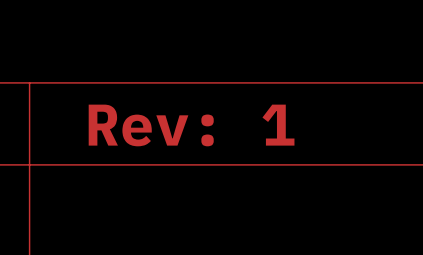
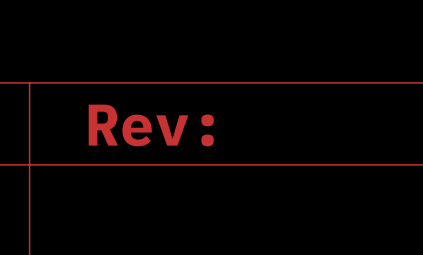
title block: Rev: 1 (191, 125) -> Rev: (151, 125)

